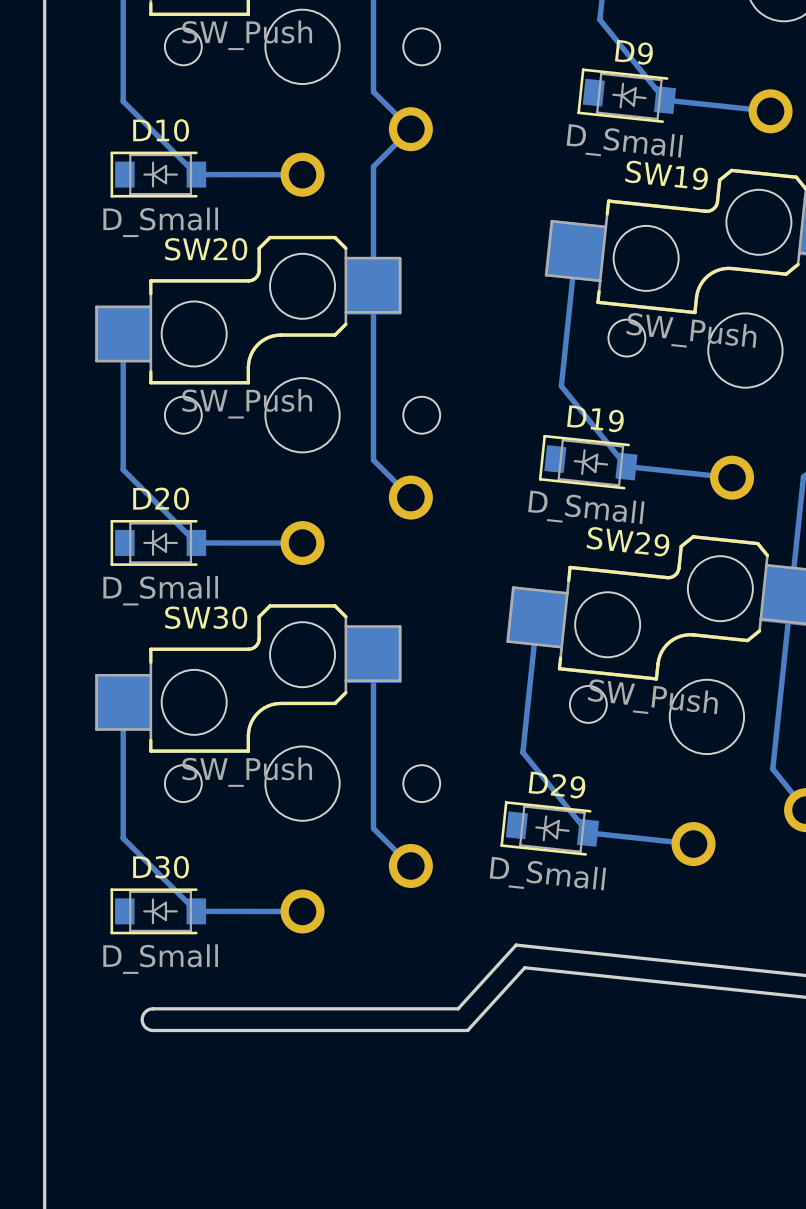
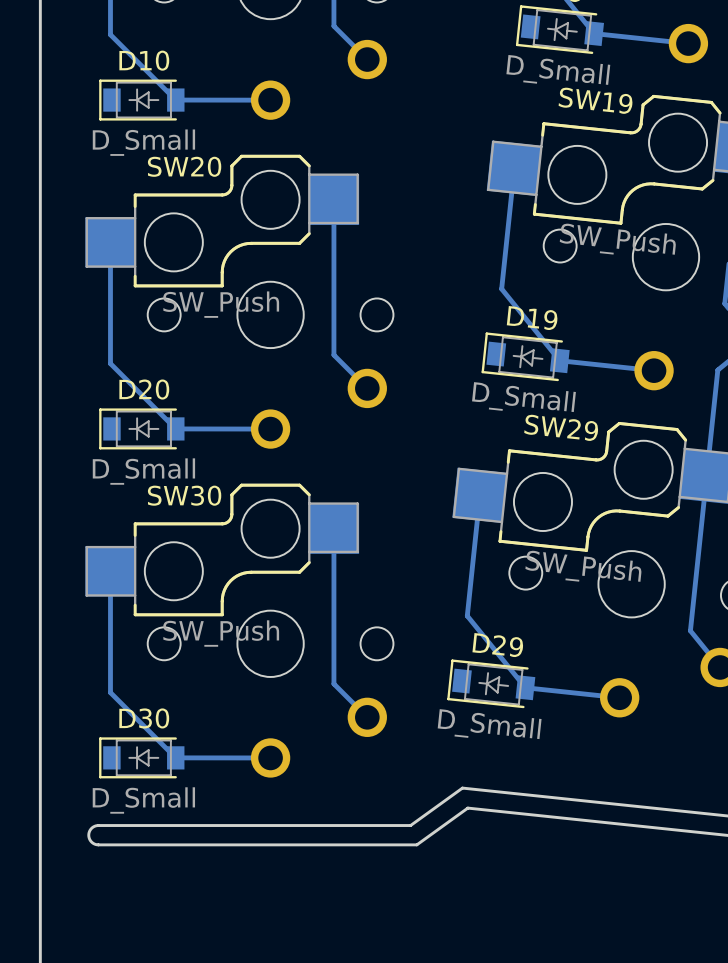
track: (410, 129) (373, 166) (373, 286) -> none
board edge: (517, 945) (458, 1008) (153, 1008) (144, 1013) (142, 1022) (146, 1028) (153, 1030) (467, 1030) (524, 967) -> (462, 788) (410, 825) (98, 825) (91, 828) (88, 836) (92, 842) (98, 844) (416, 844) (469, 808)

